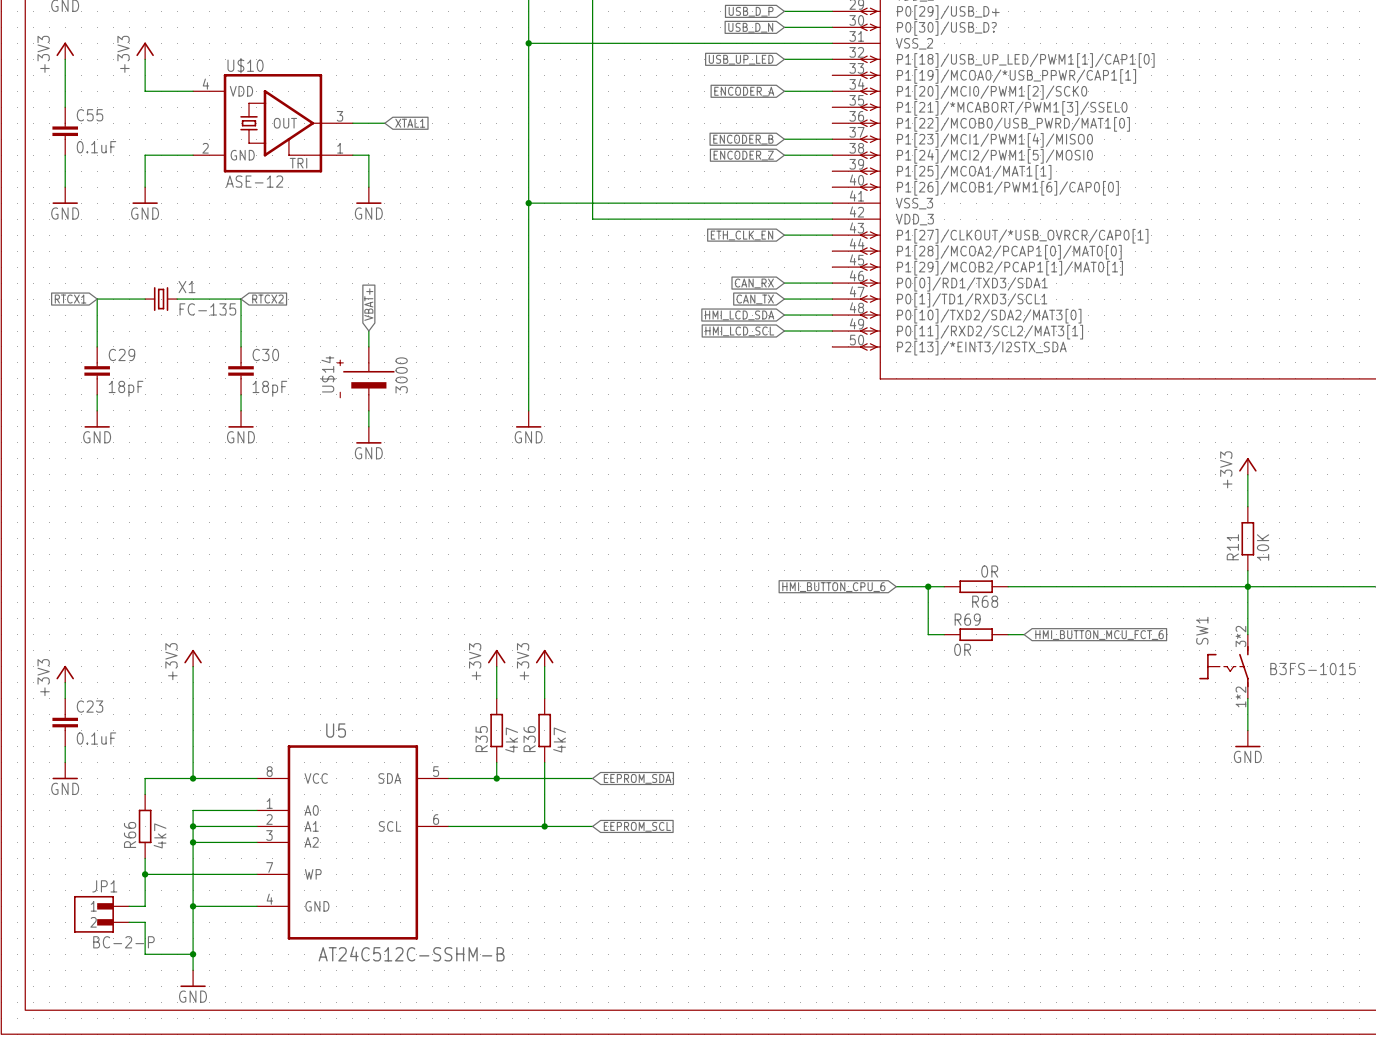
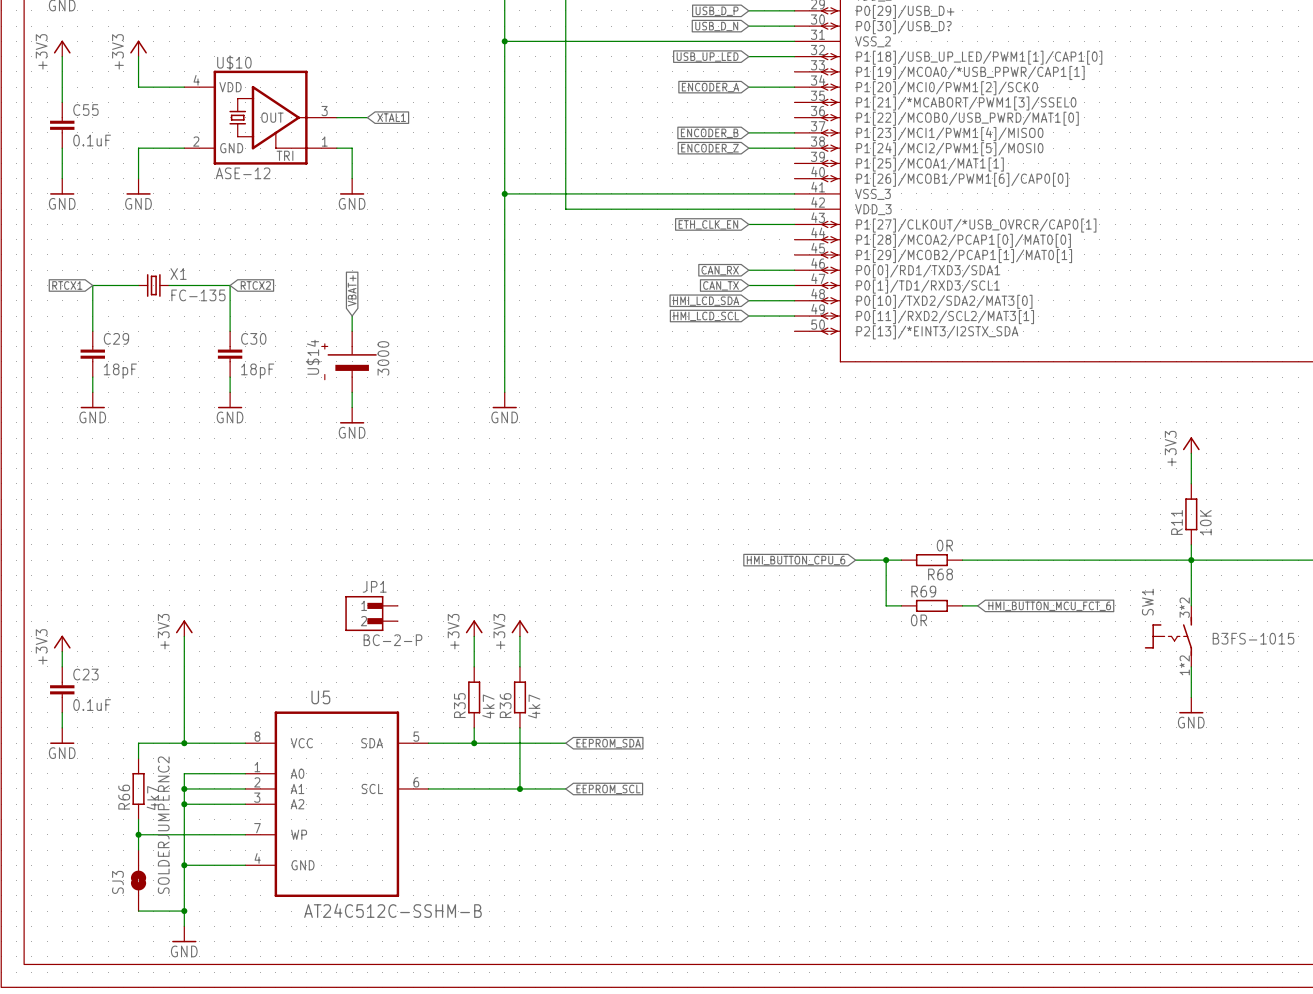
wire: (145, 890) (145, 906) (129, 906) -> none
JP1 position: (101, 914) -> (371, 613)
SJ3: none -> SOLDERJUMPERNC2 (138, 880)

